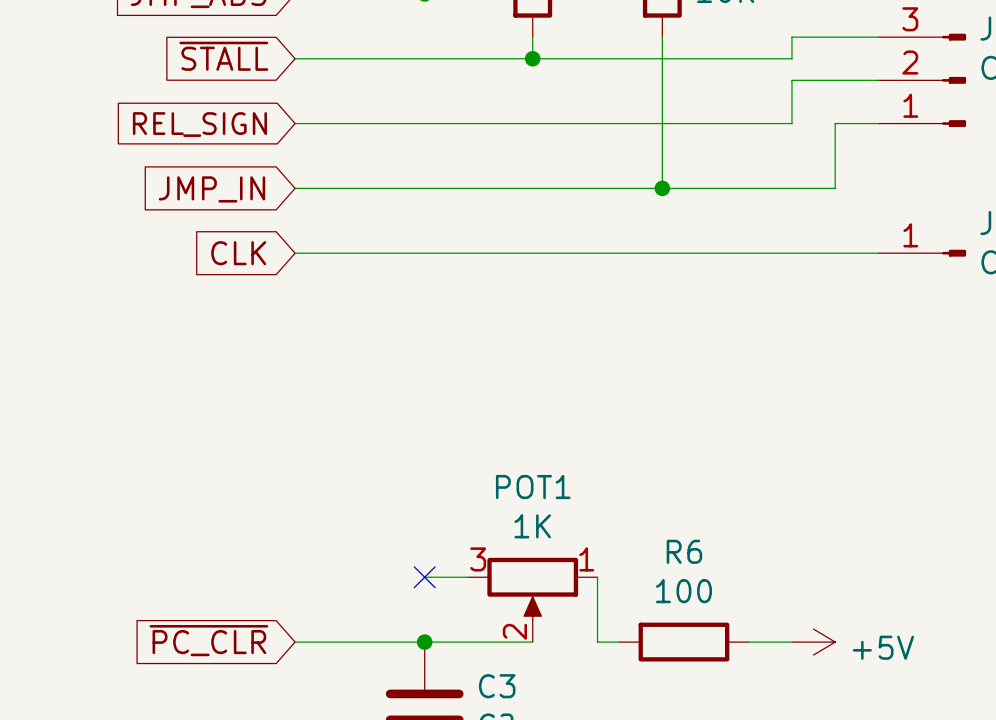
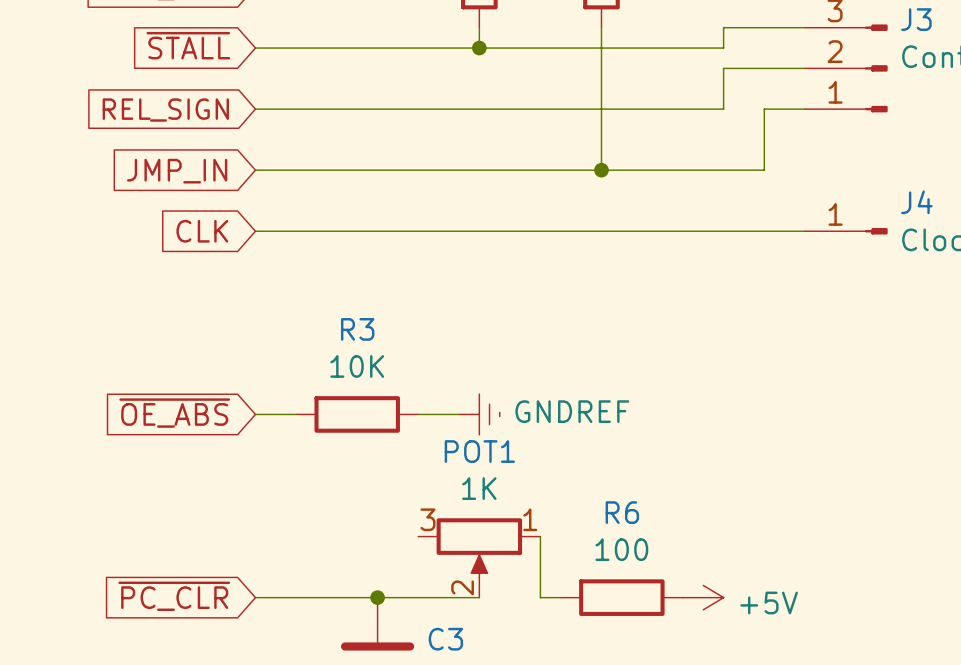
global label: none -> ~{OE_ABS} (174, 413)
wire: none -> (255, 414) (296, 414)
R3: none -> 10K (357, 414)
power symbol: none -> GNDREF (479, 414)
wire: (424, 577) (467, 577) -> (418, 414) (458, 414)
no-connect mark: (424, 577) -> none
power symbol position: +5V (813, 642) -> +5V (703, 597)

